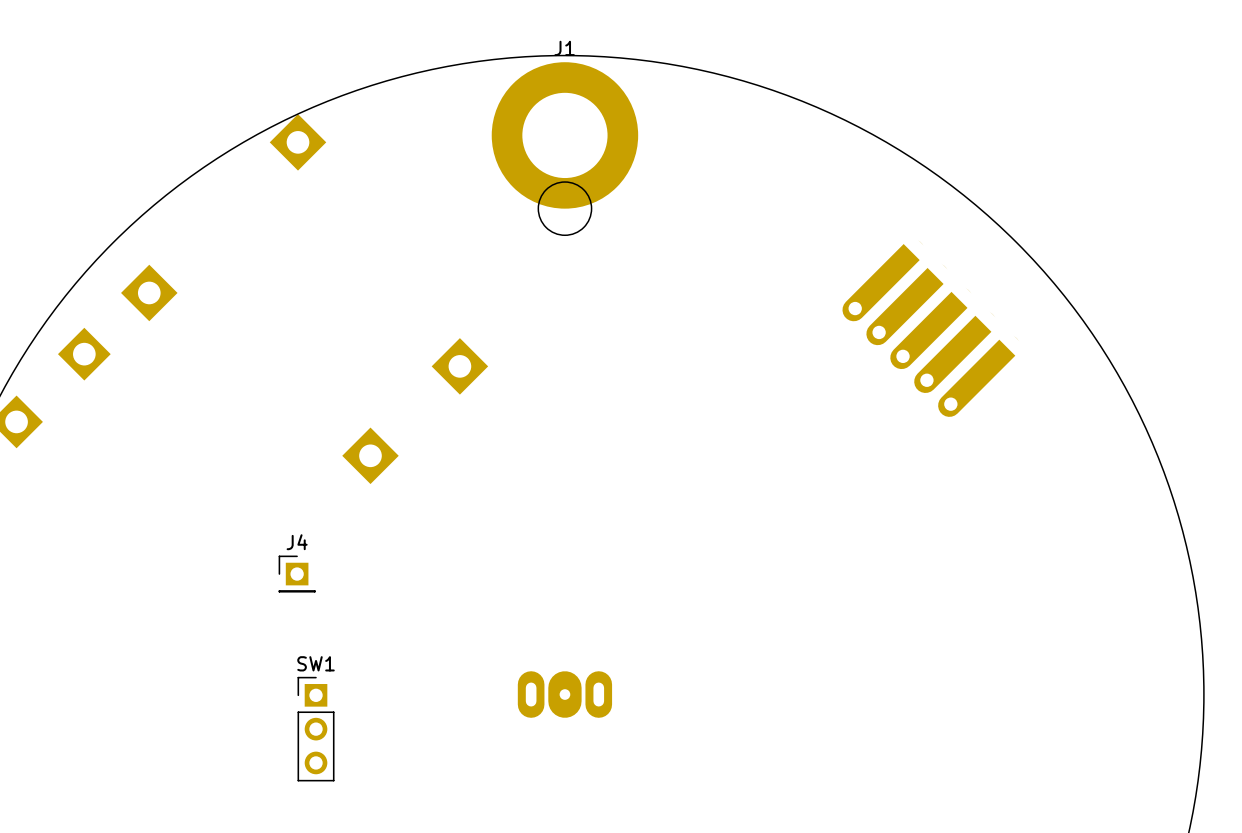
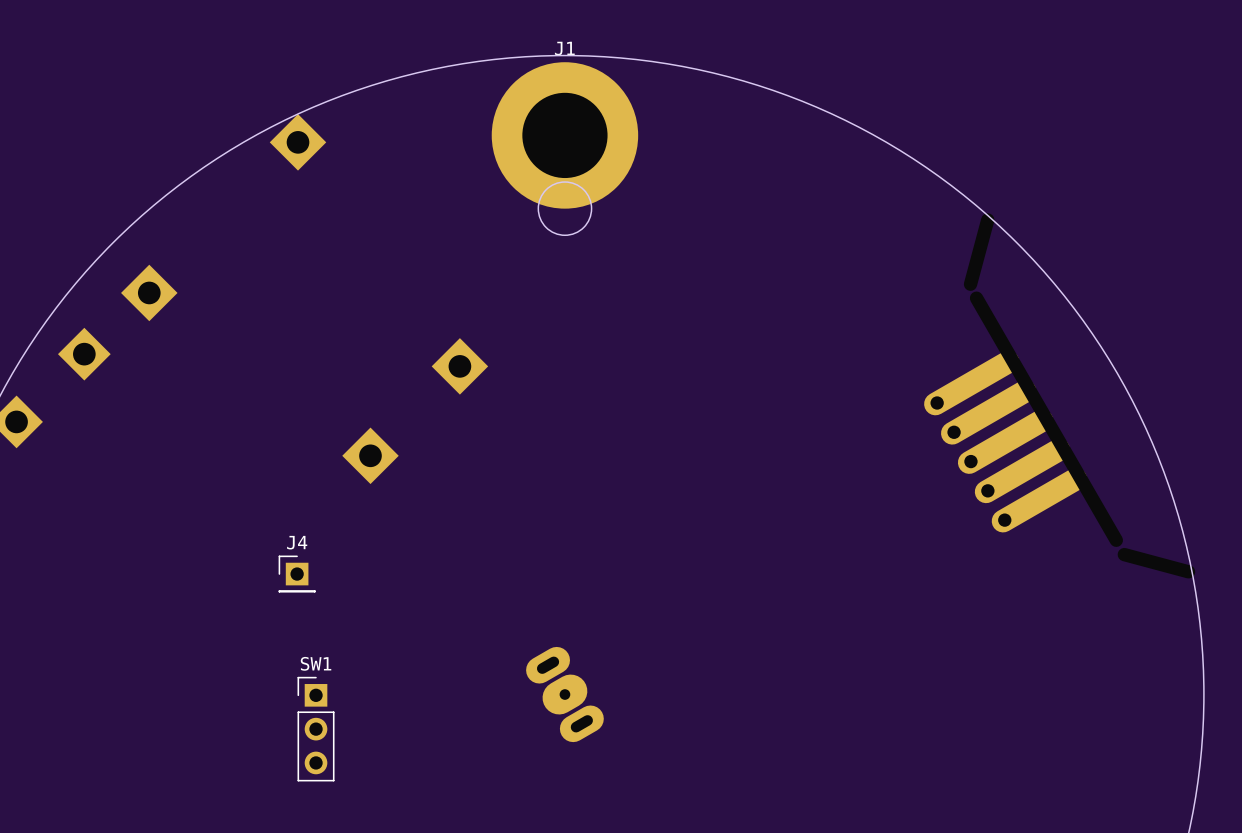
part: (995, 264) -> none
part: none -> (1059, 395)
part rotation: 0° (564, 694) -> 60° clockwise (564, 694)

